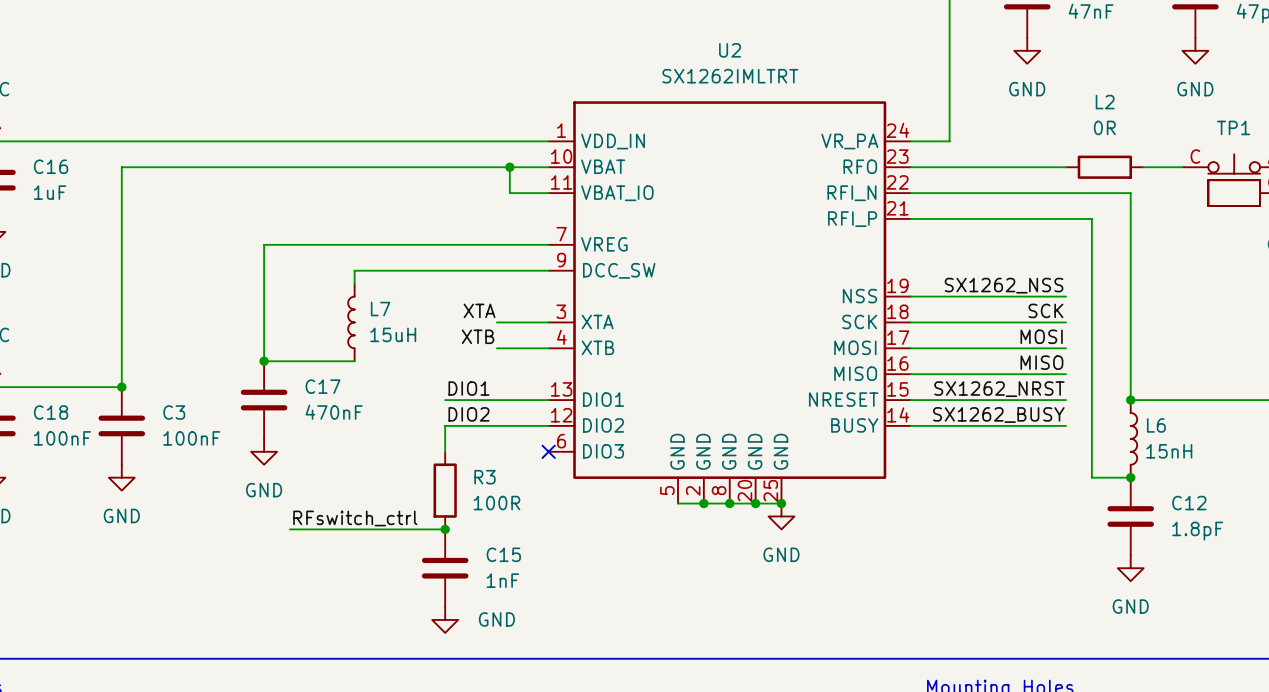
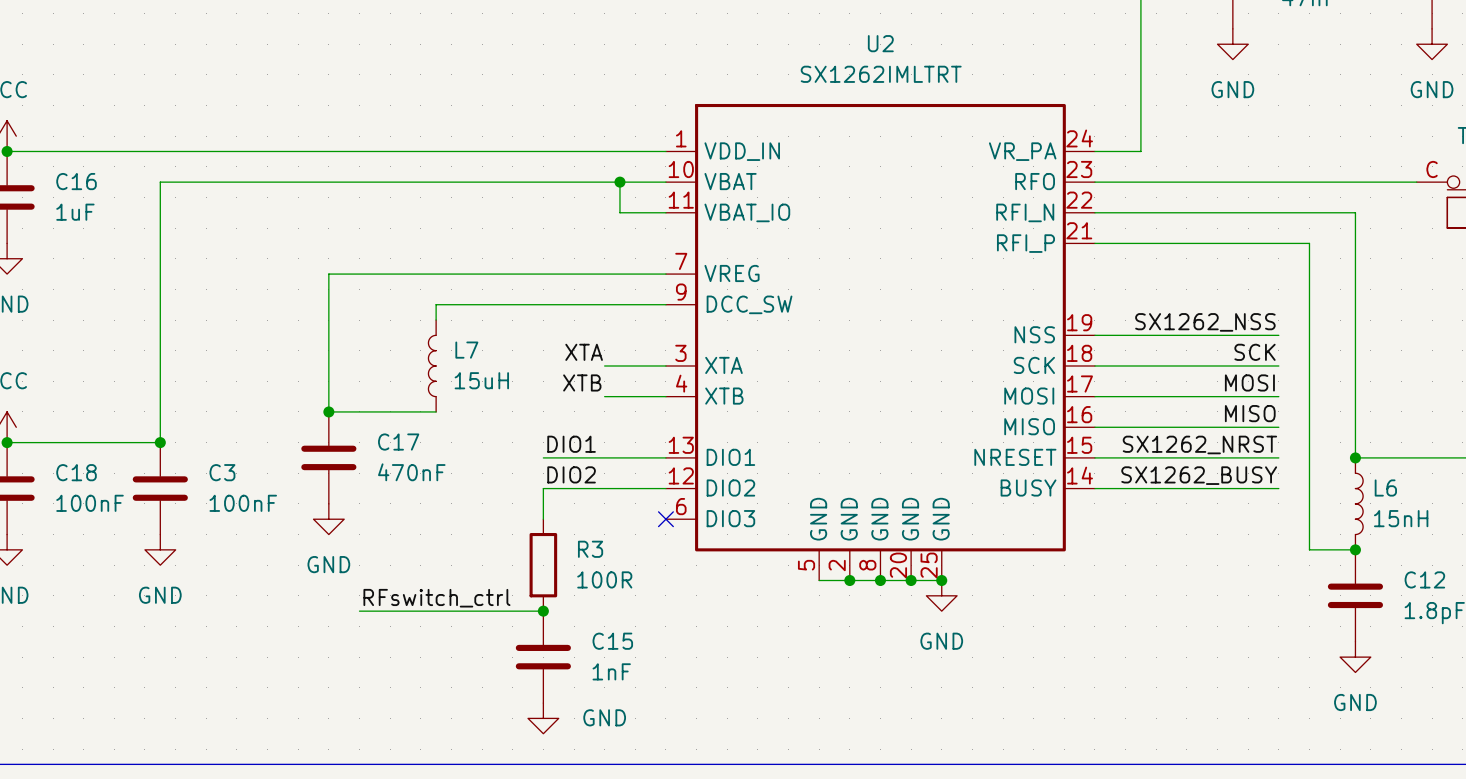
wire: none -> (1278, 182) (1370, 182)
L2: 0R (1104, 167) -> none

